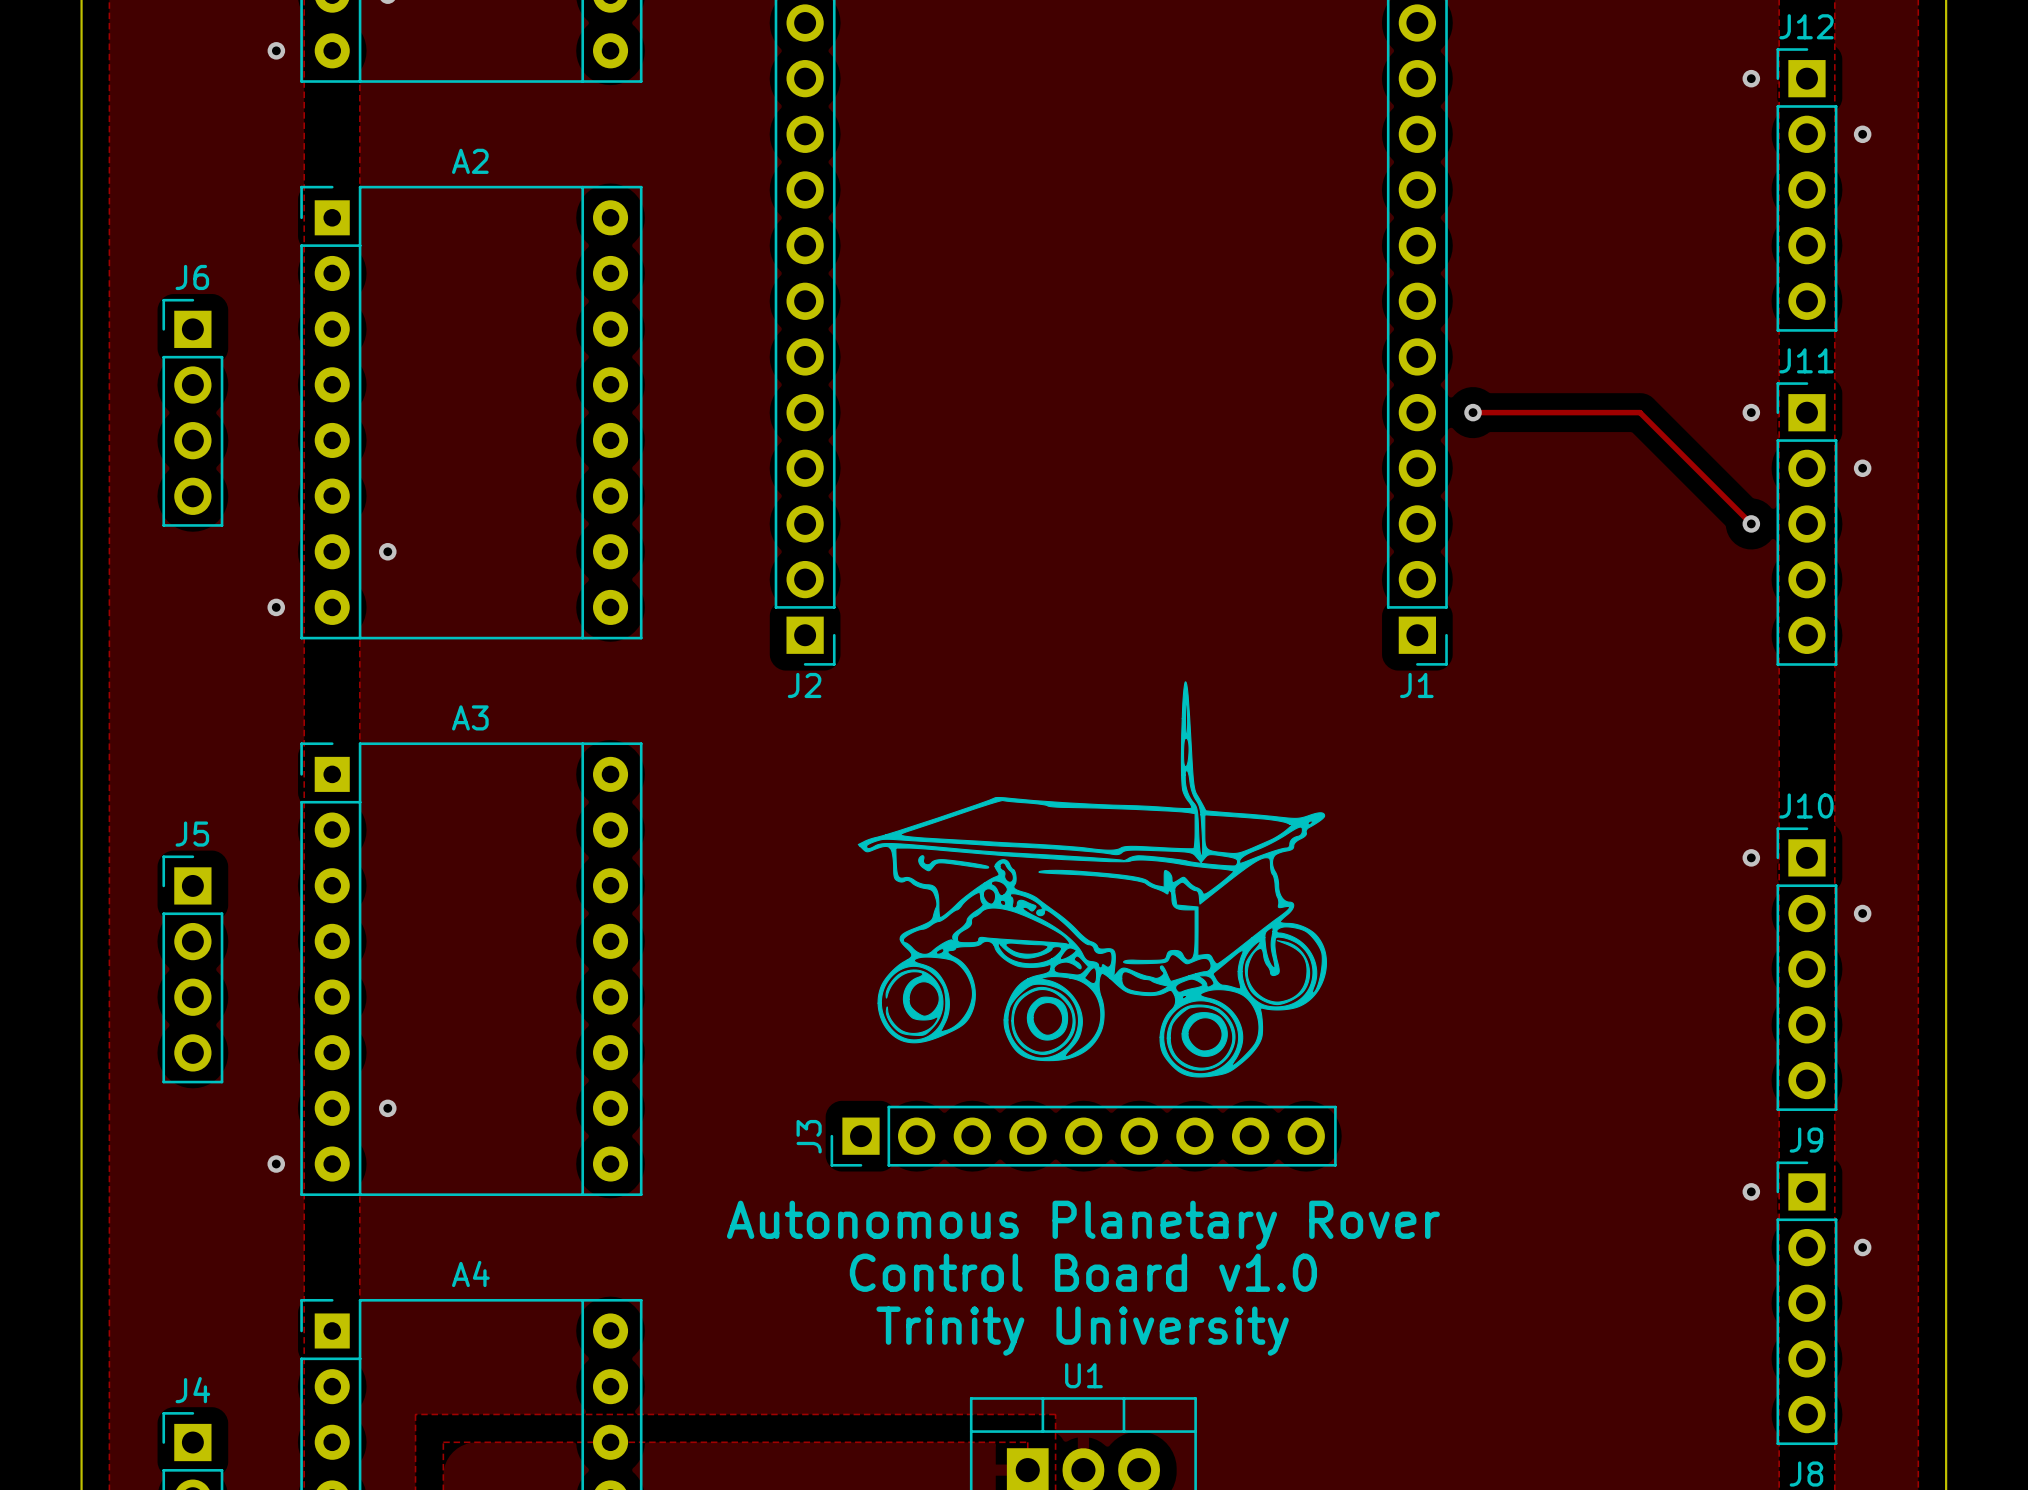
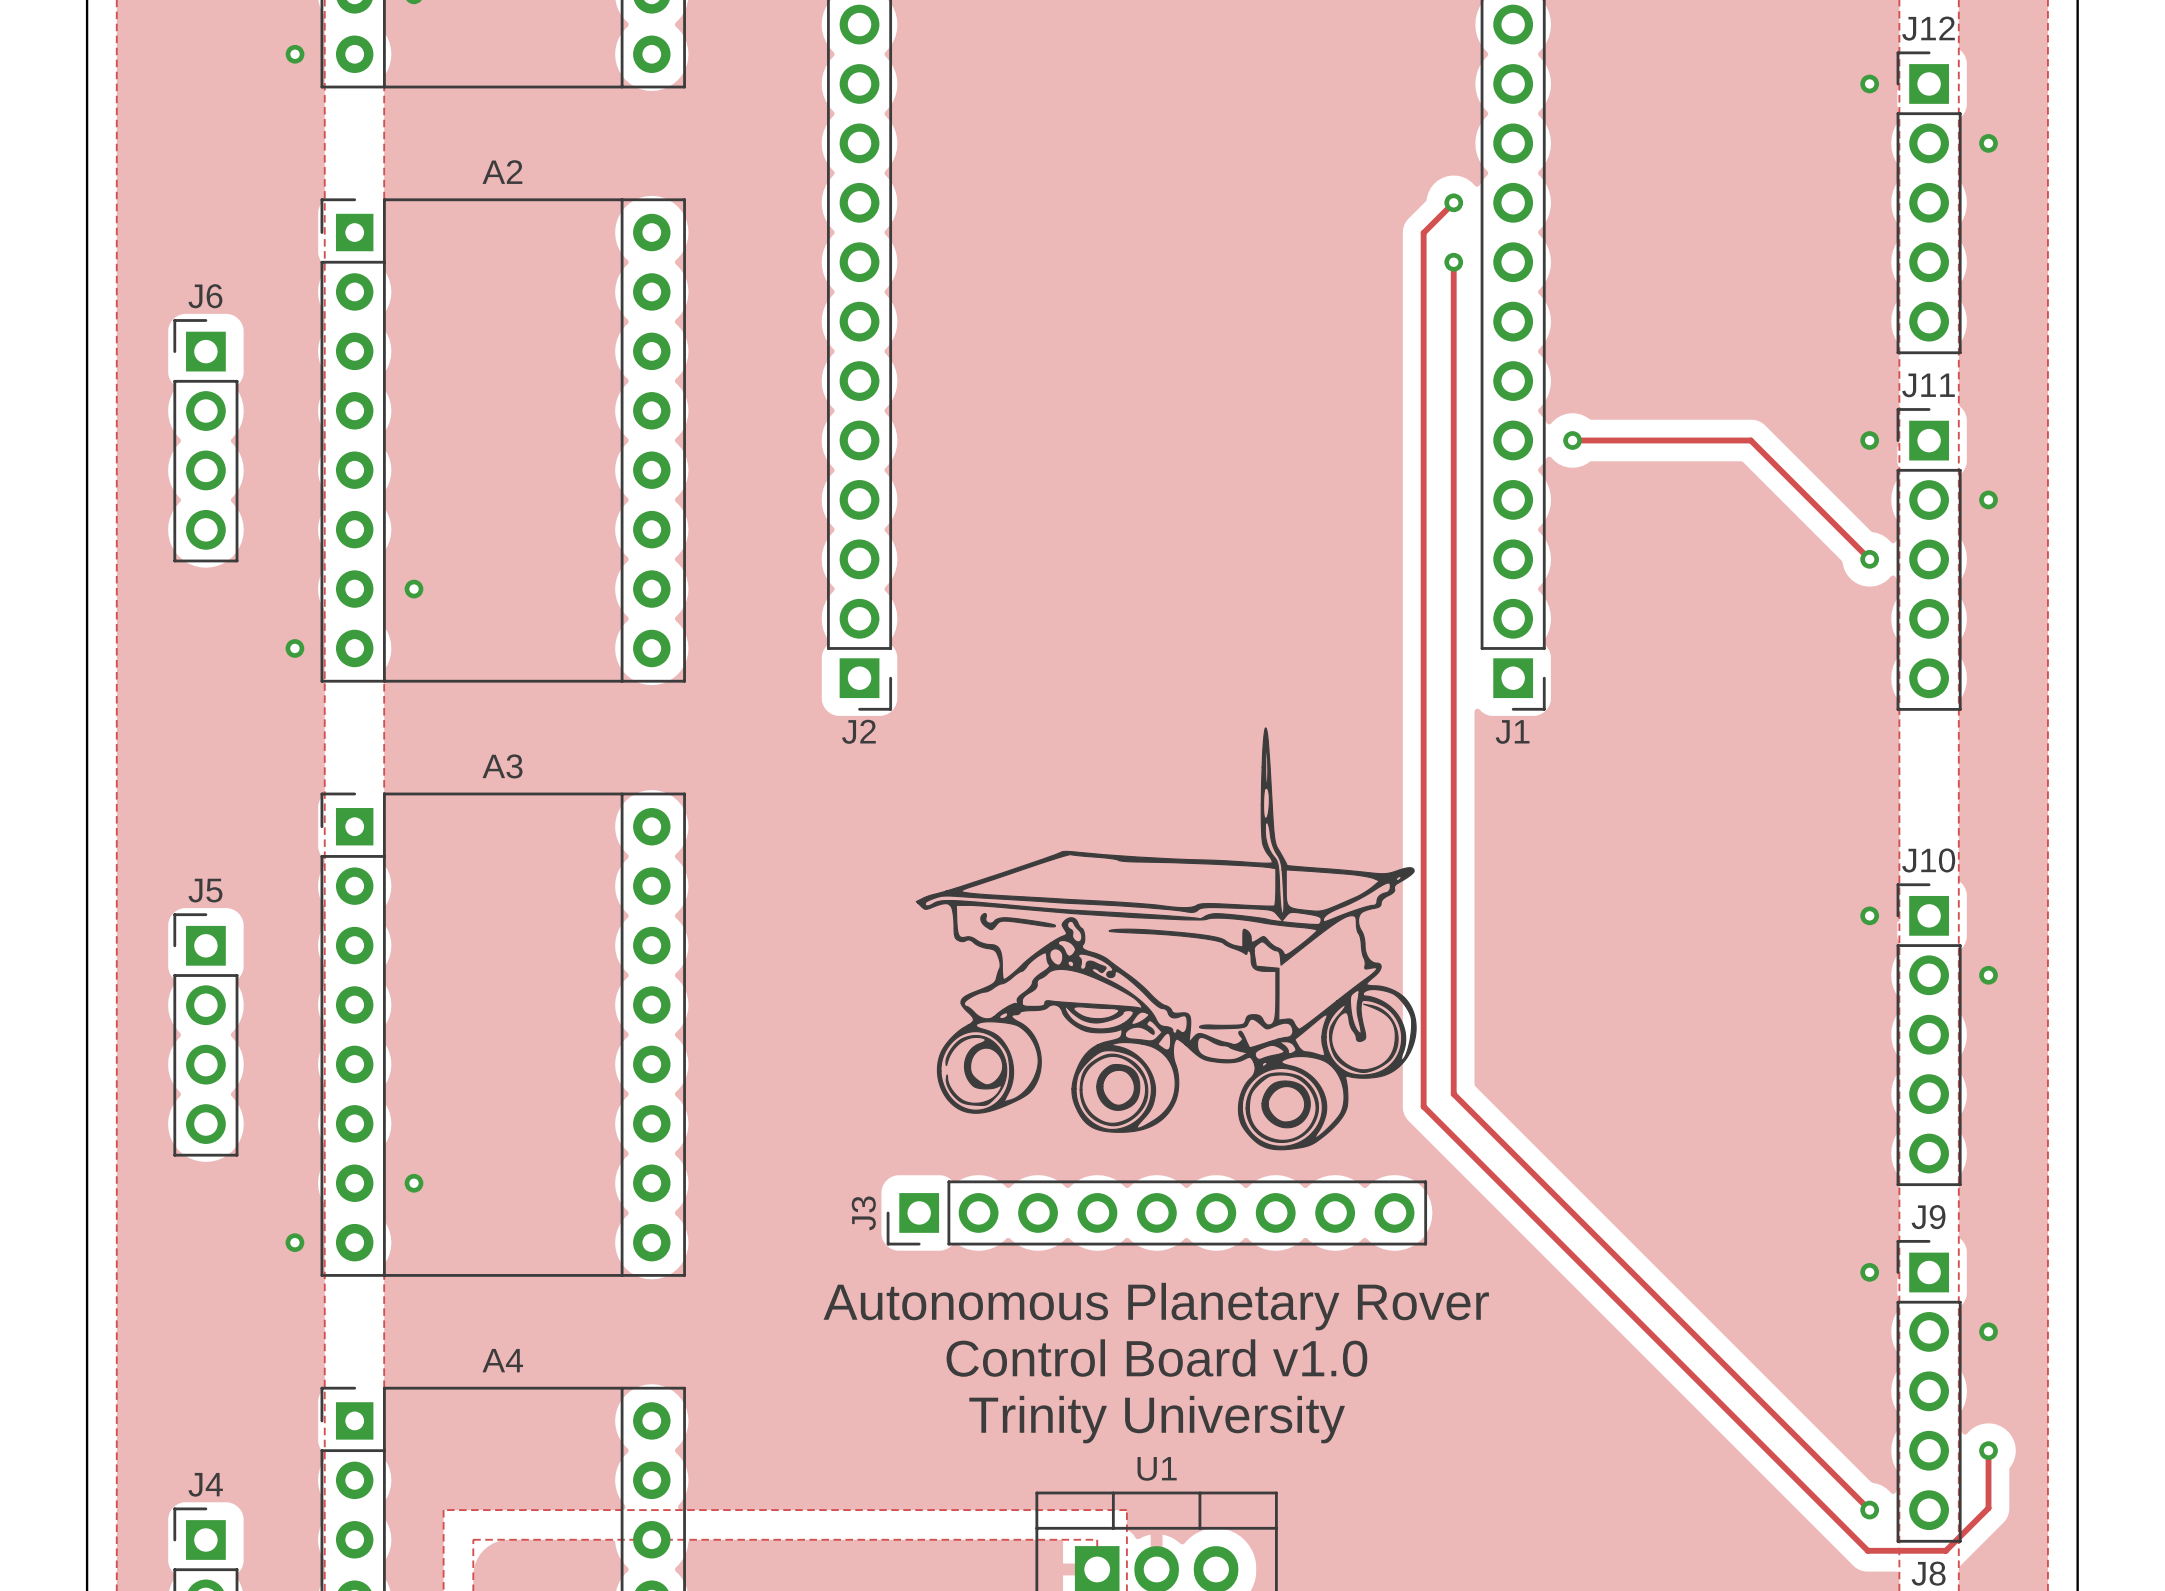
track: none -> (1453, 202) (1423, 232) (1423, 1106) (1867, 1550) (1945, 1550) (1988, 1508) (1988, 1450)
via: none -> (1453, 202)
track: none -> (1453, 262) (1453, 1094) (1869, 1510)
via: none -> (1453, 262)
via: none -> (1988, 1450)
via: none -> (1869, 1510)

